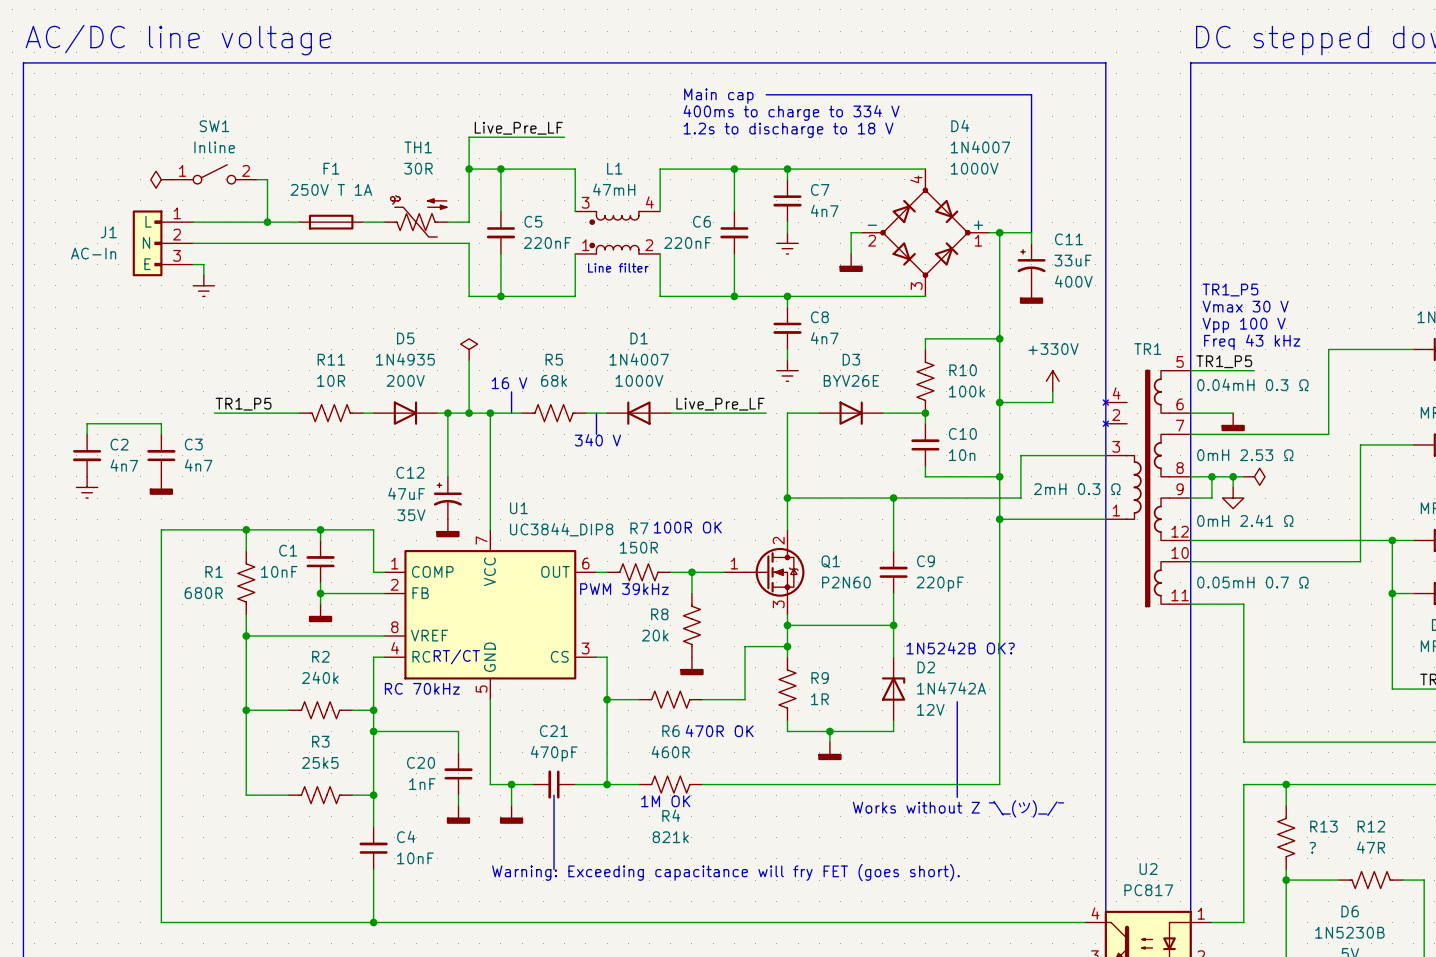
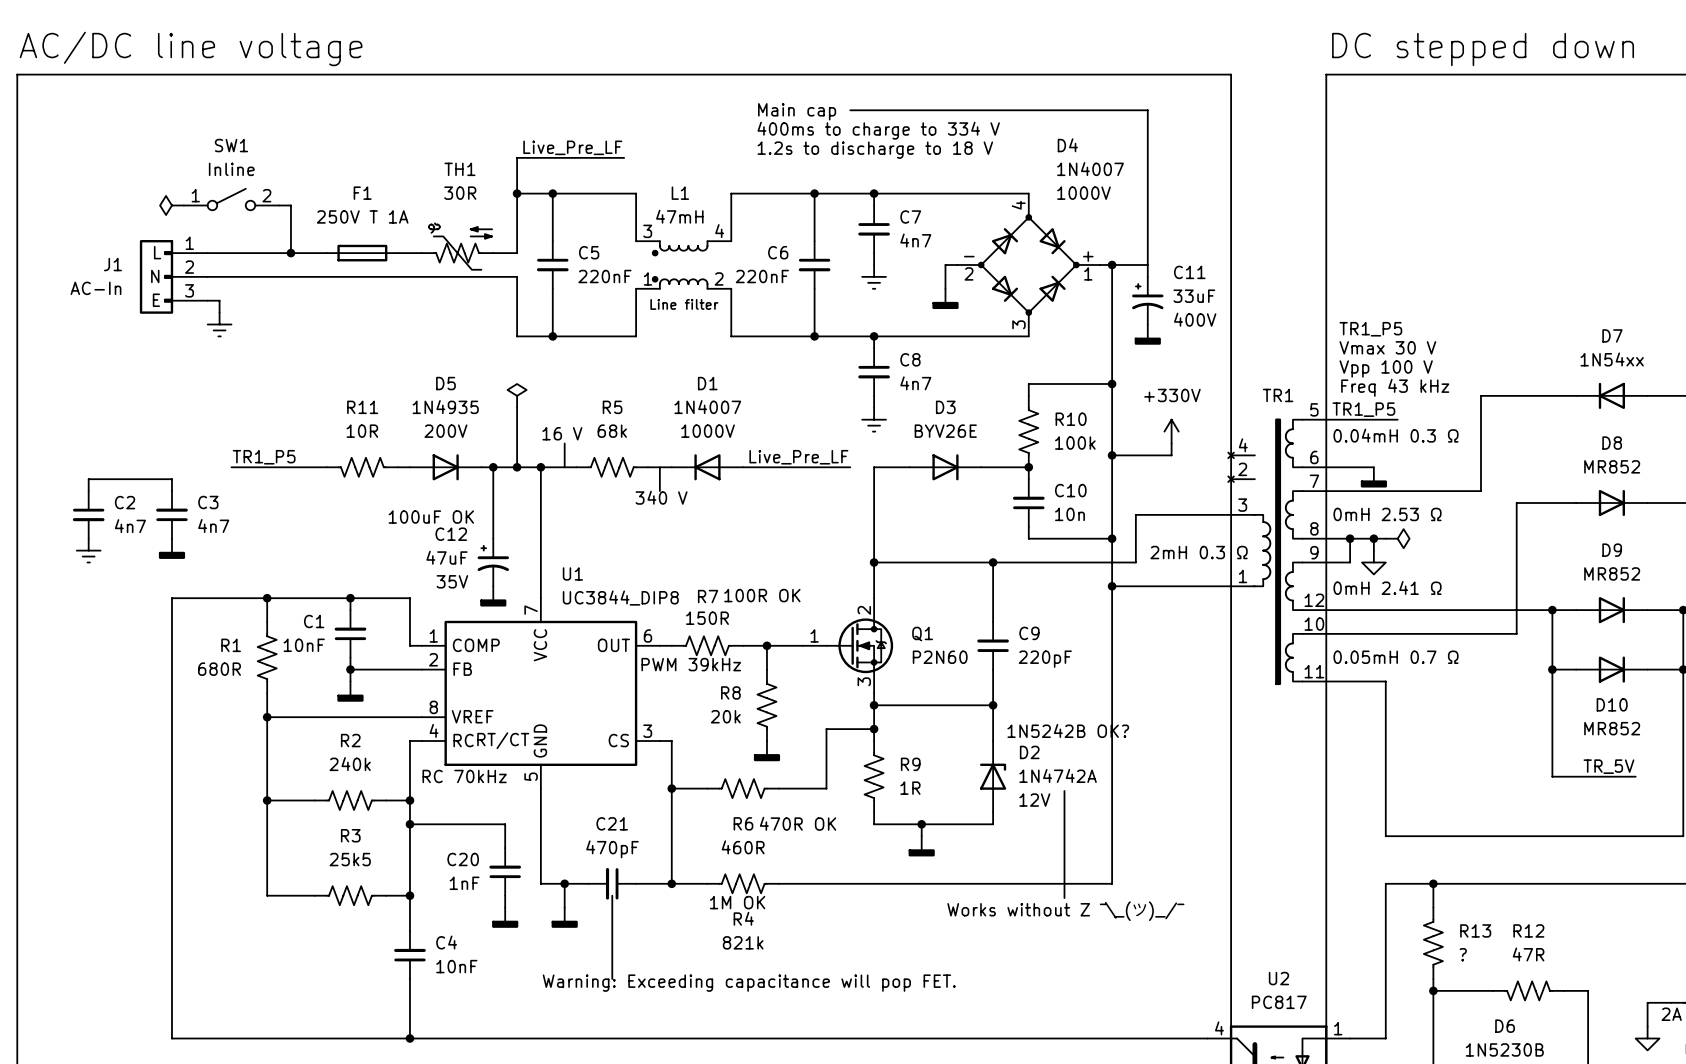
text: none -> 100uF OK (431, 517)
text: Warning: Exceeding capacitance will fry FET (goes short). (725, 872) -> Warning: Exceeding capacitance will pop FET. (749, 983)

